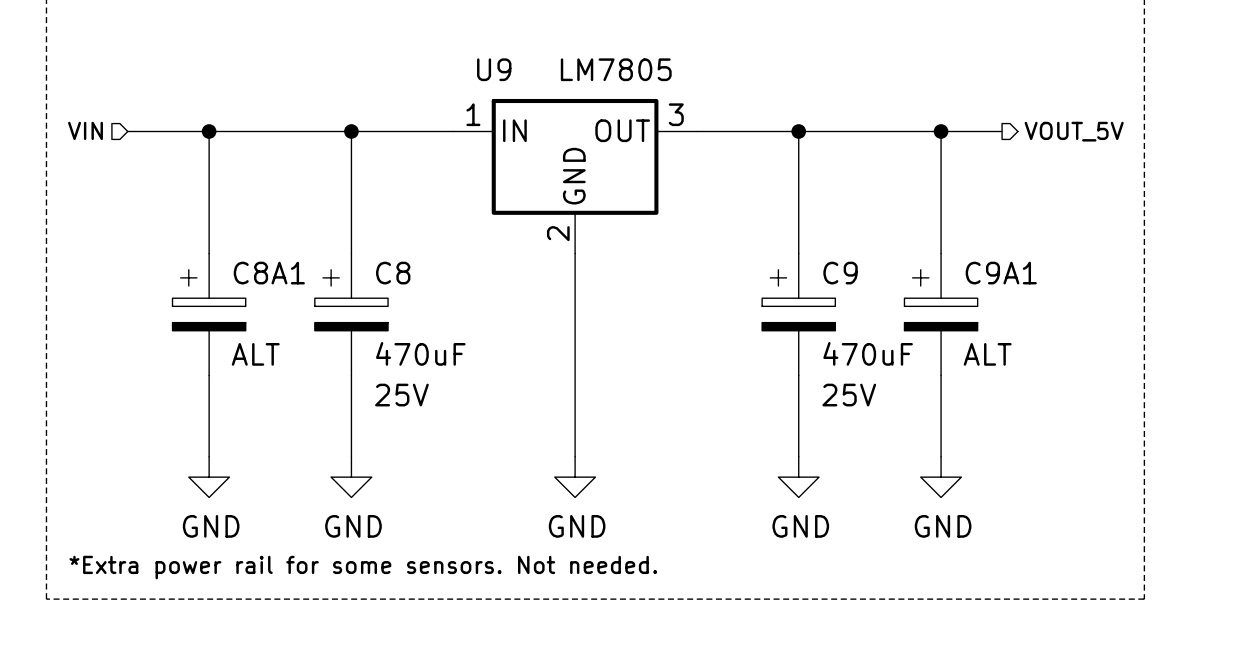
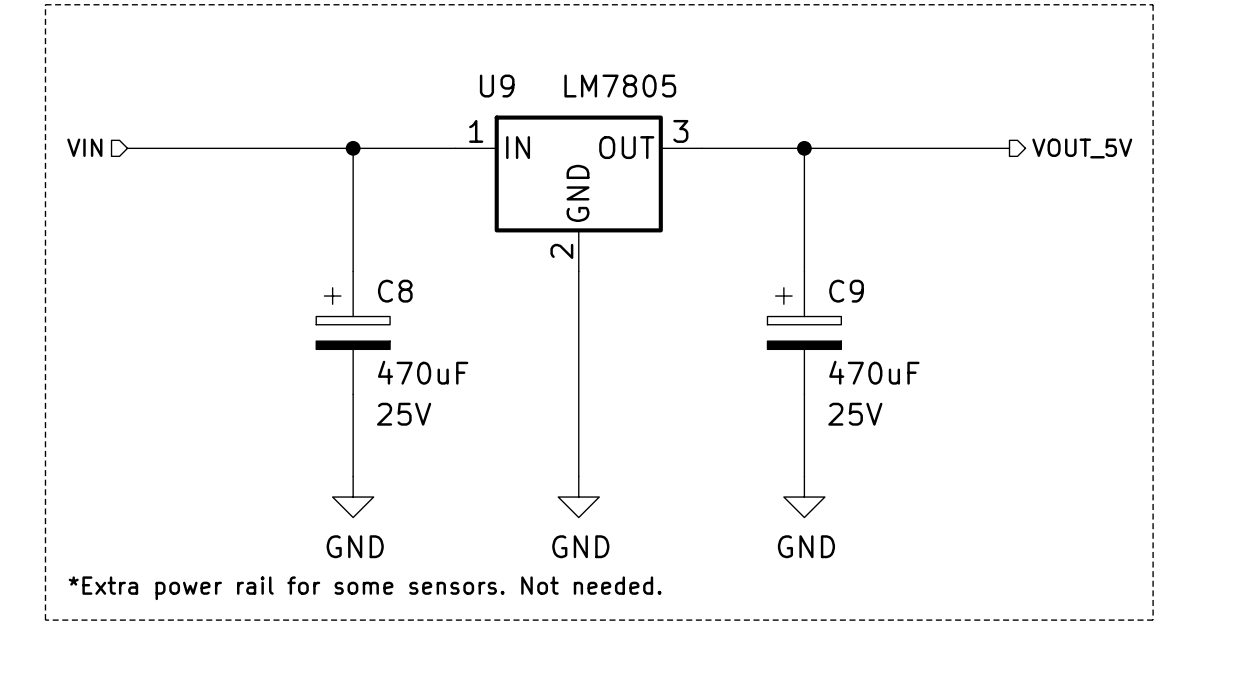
wire: (209, 131) (209, 253) -> none
junction: (209, 131) -> none
wire: (941, 131) (941, 253) -> none
junction: (941, 131) -> none
C8A1: ALT (209, 314) -> none
C9A1: ALT (941, 314) -> none
wire: (209, 375) (209, 456) -> none
wire: (941, 375) (941, 456) -> none
power symbol: GND (209, 477) -> none
power symbol: GND (941, 477) -> none

